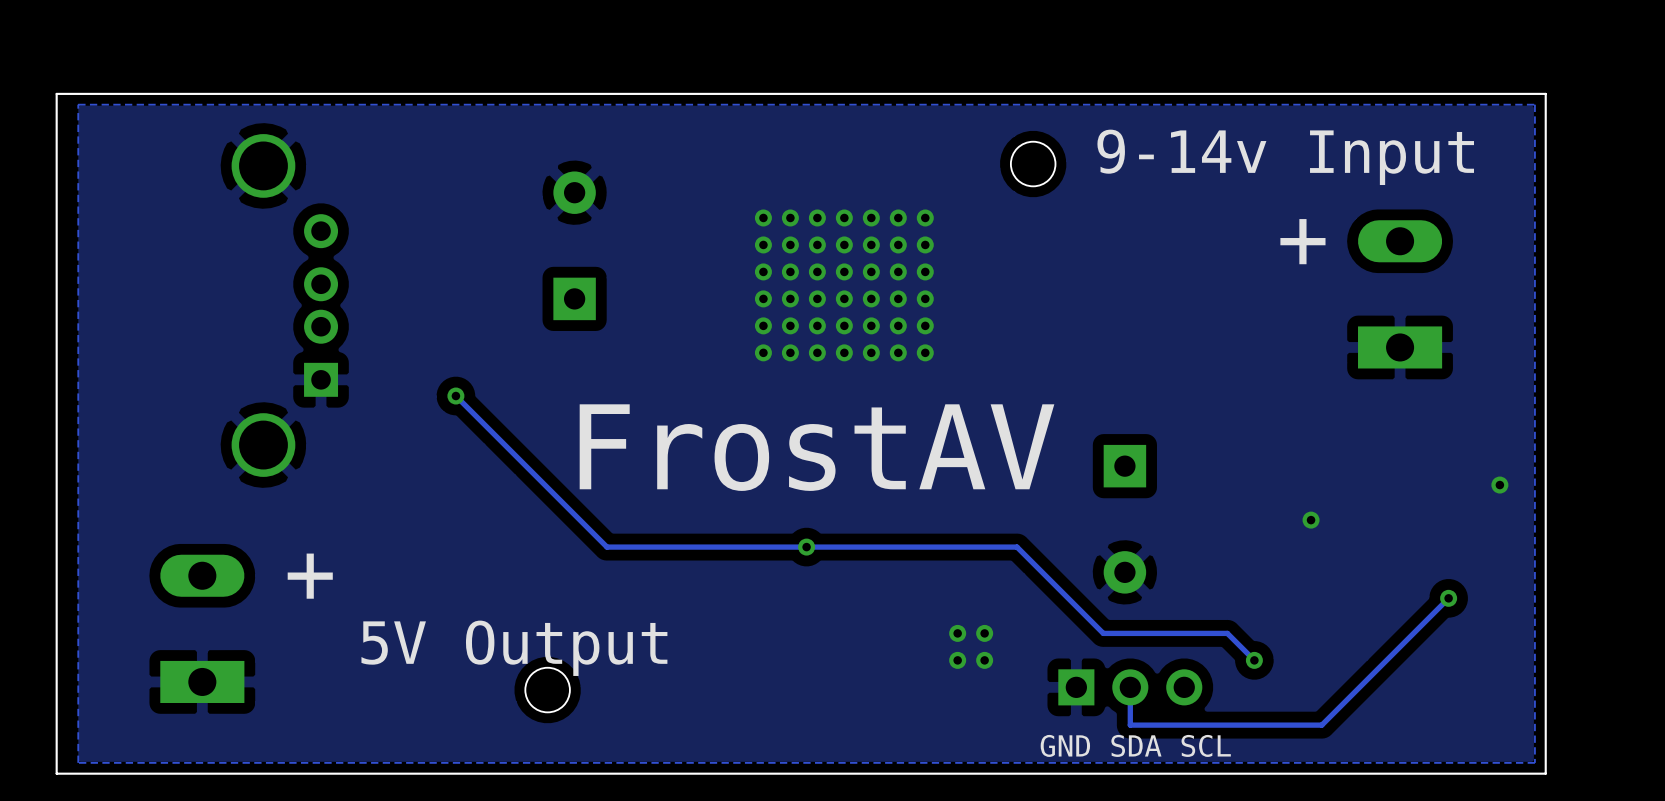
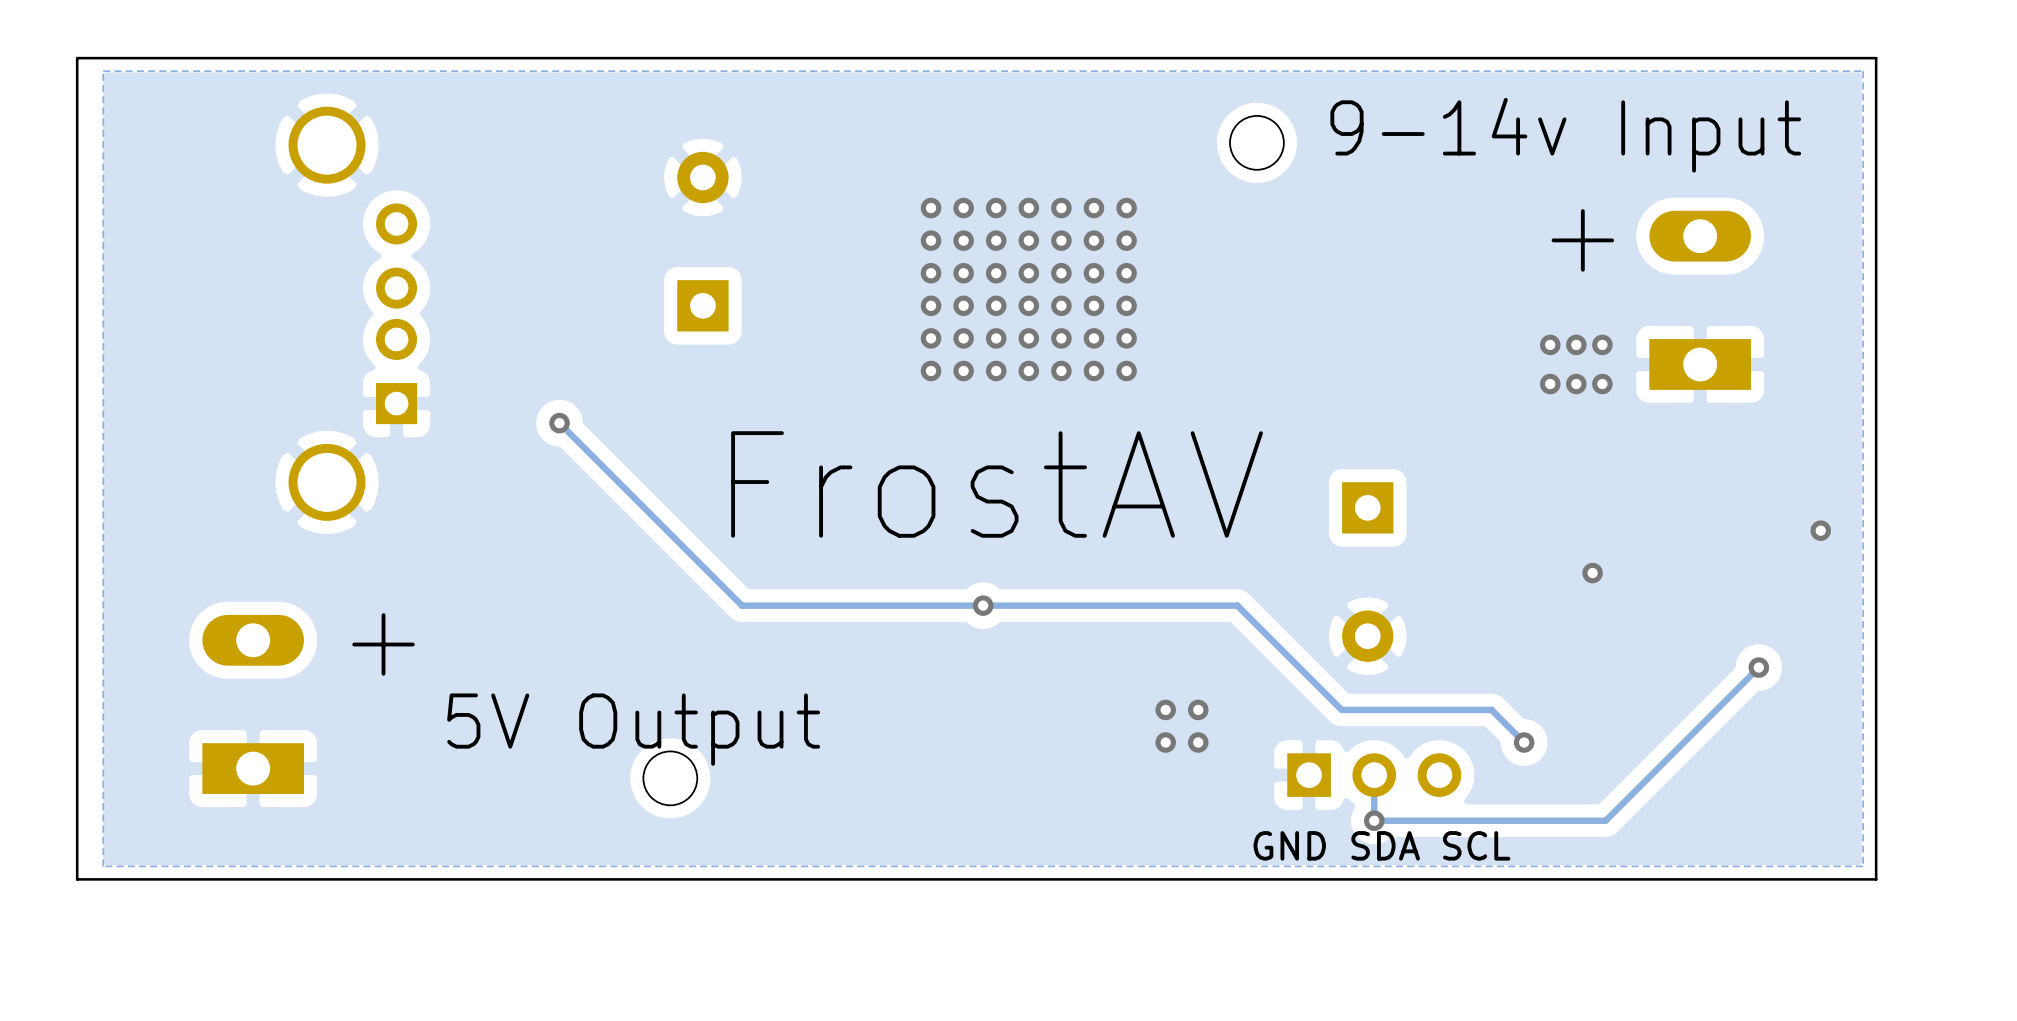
via: none -> (1550, 344)
via: none -> (1576, 344)
via: none -> (1602, 344)
via: none -> (1550, 384)
via: none -> (1576, 384)
via: none -> (1602, 384)
via: none -> (1374, 820)

